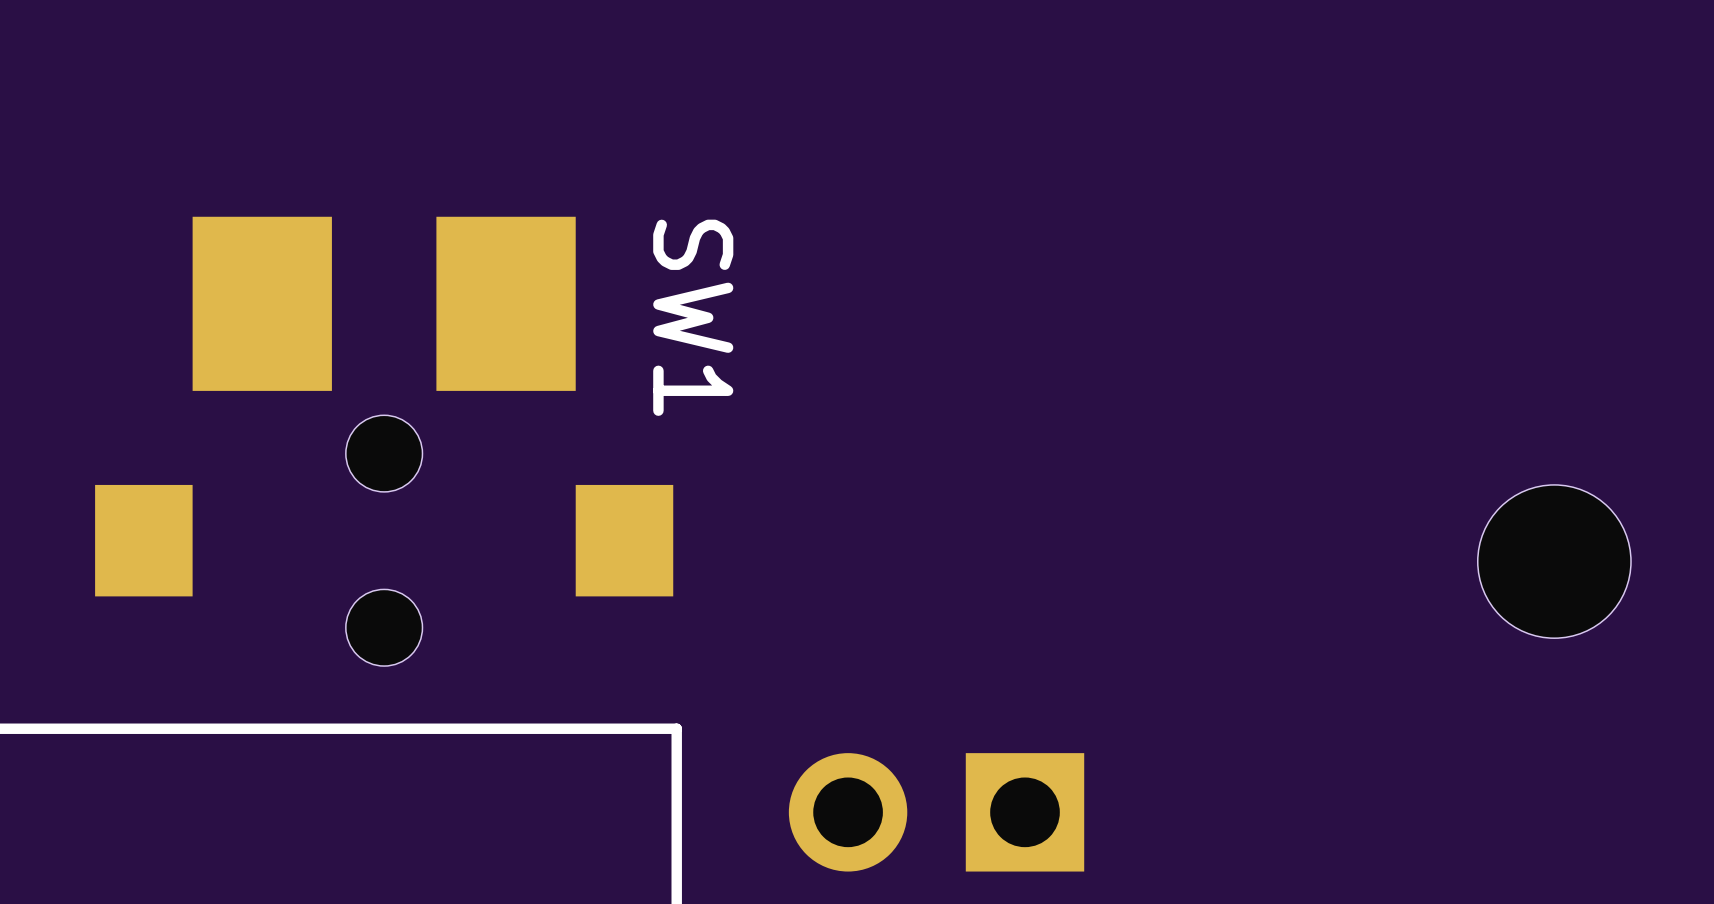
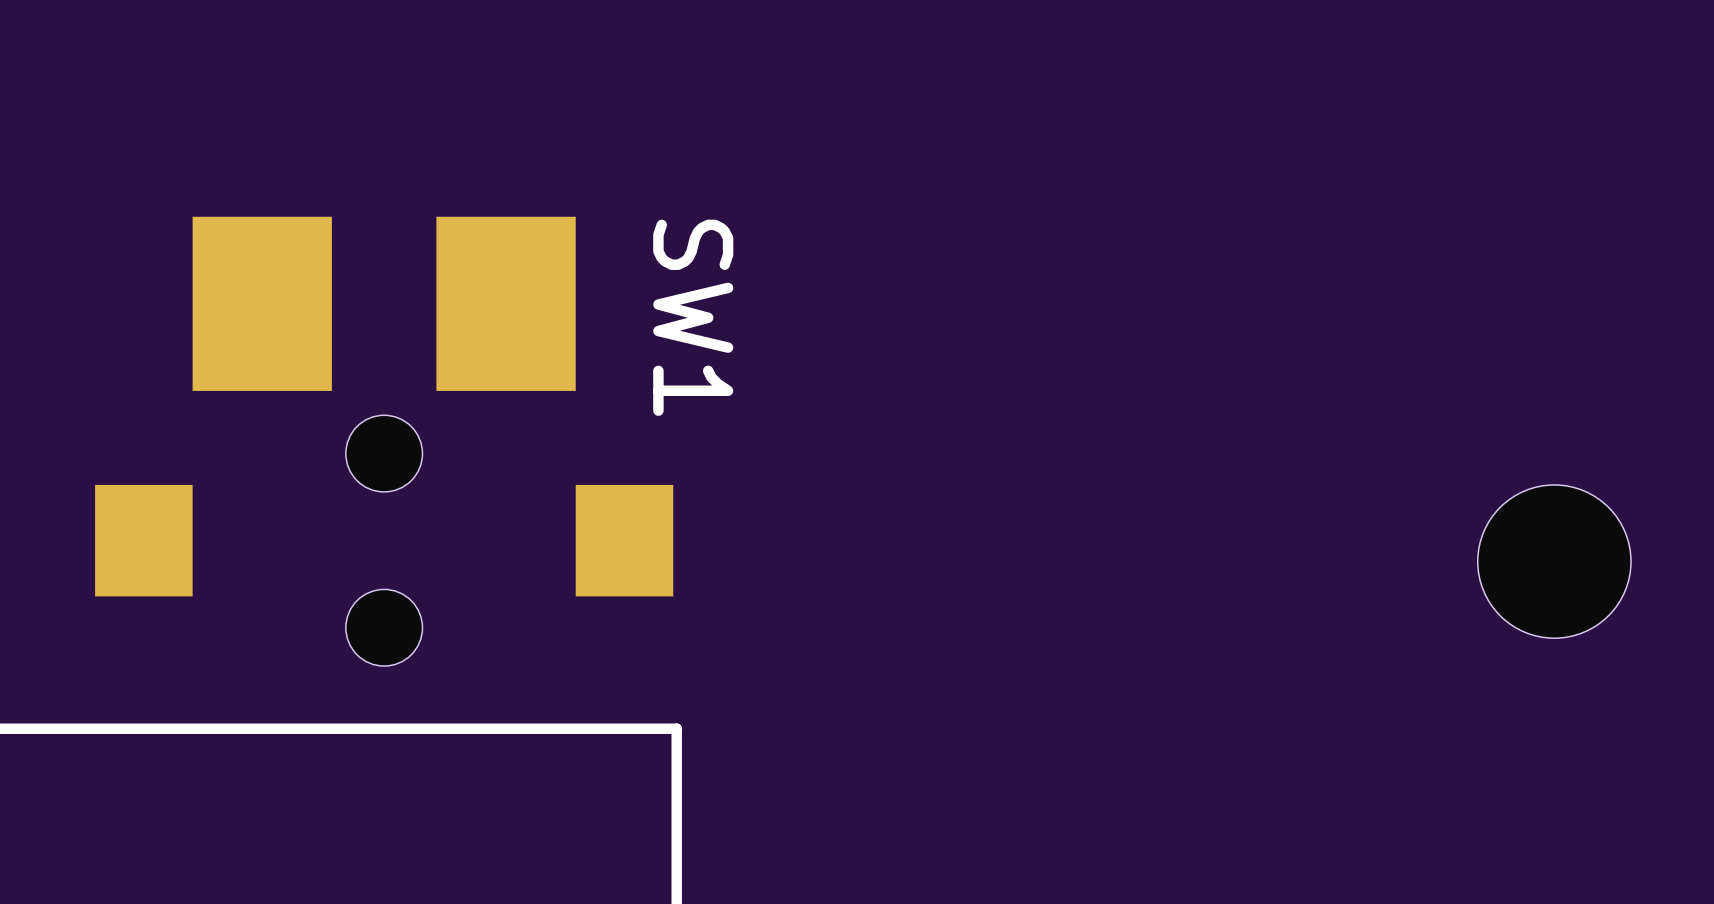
part: (936, 812) -> none

